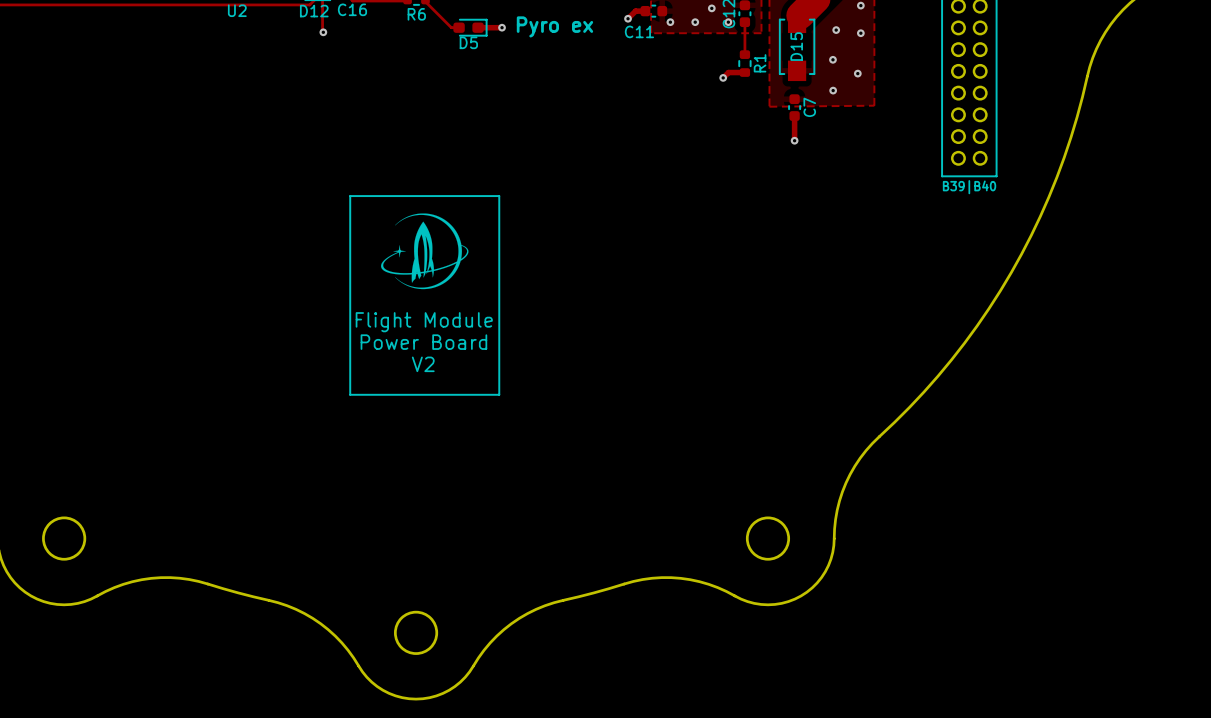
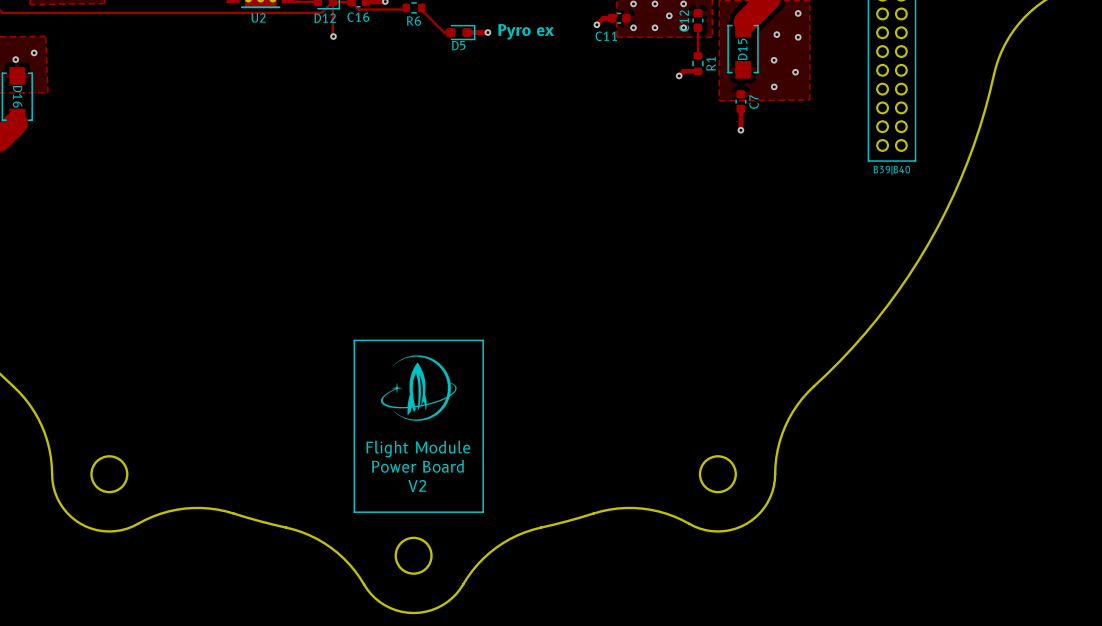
line: (350, 196) (499, 196) (499, 394) (350, 394) (350, 196) -> (354, 340) (483, 340) (483, 512) (354, 512) (354, 340)
drawing position: (424, 251) -> (418, 388)
text position: Flight Module (424, 322) -> Flight Module (418, 449)
text position: Power Board (423, 342) -> Power Board (417, 466)
text position: V2 (423, 364) -> V2 (417, 485)

